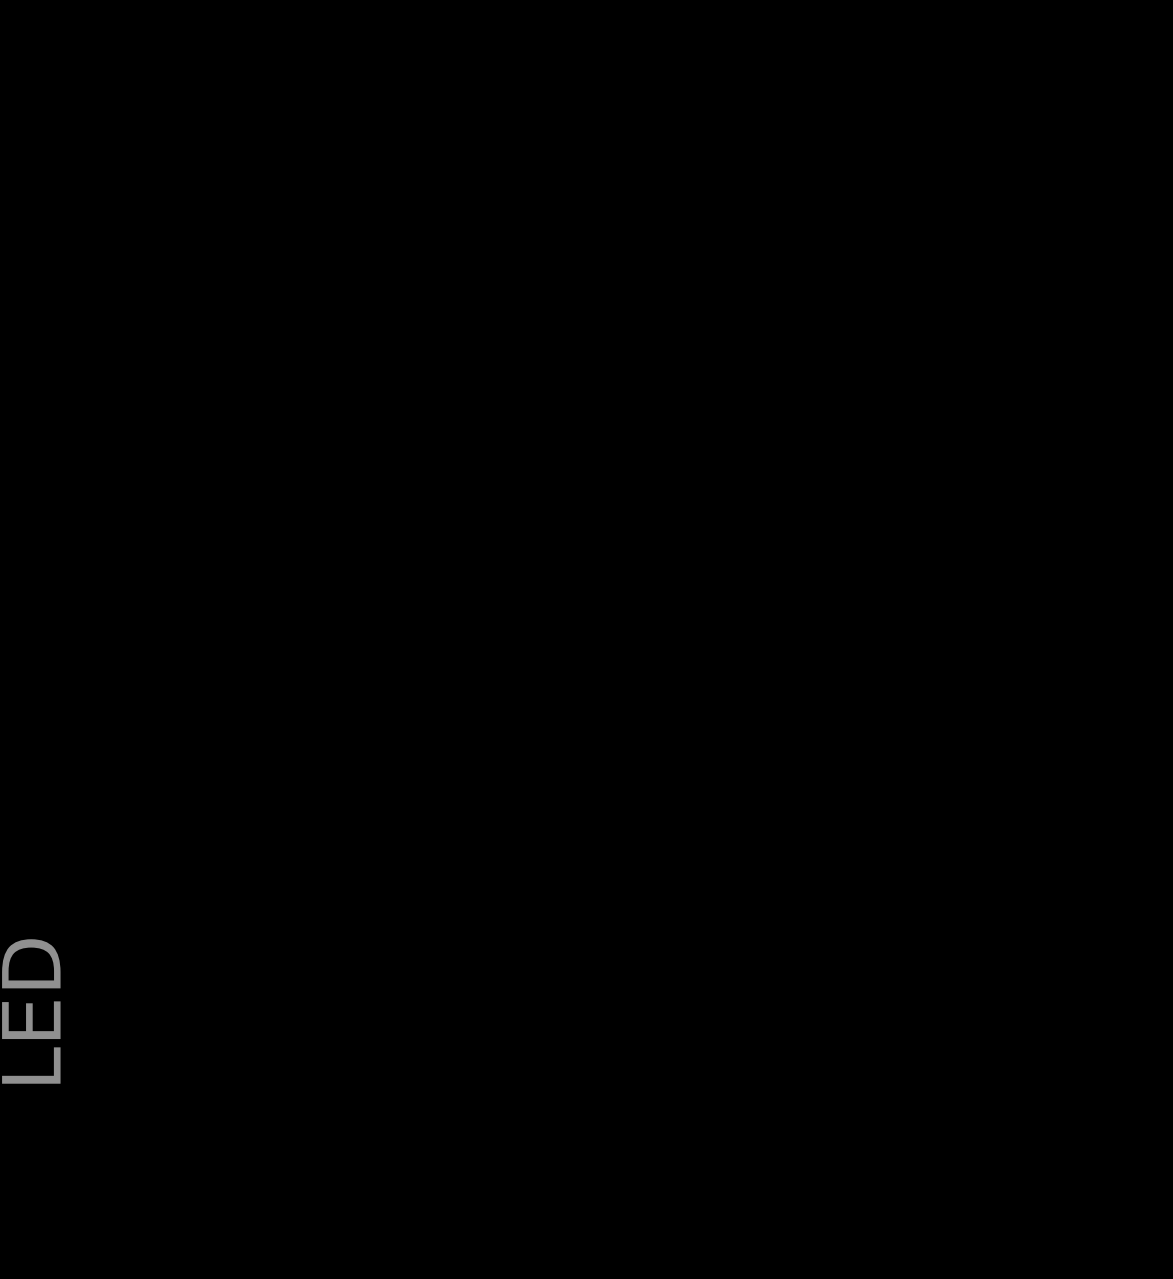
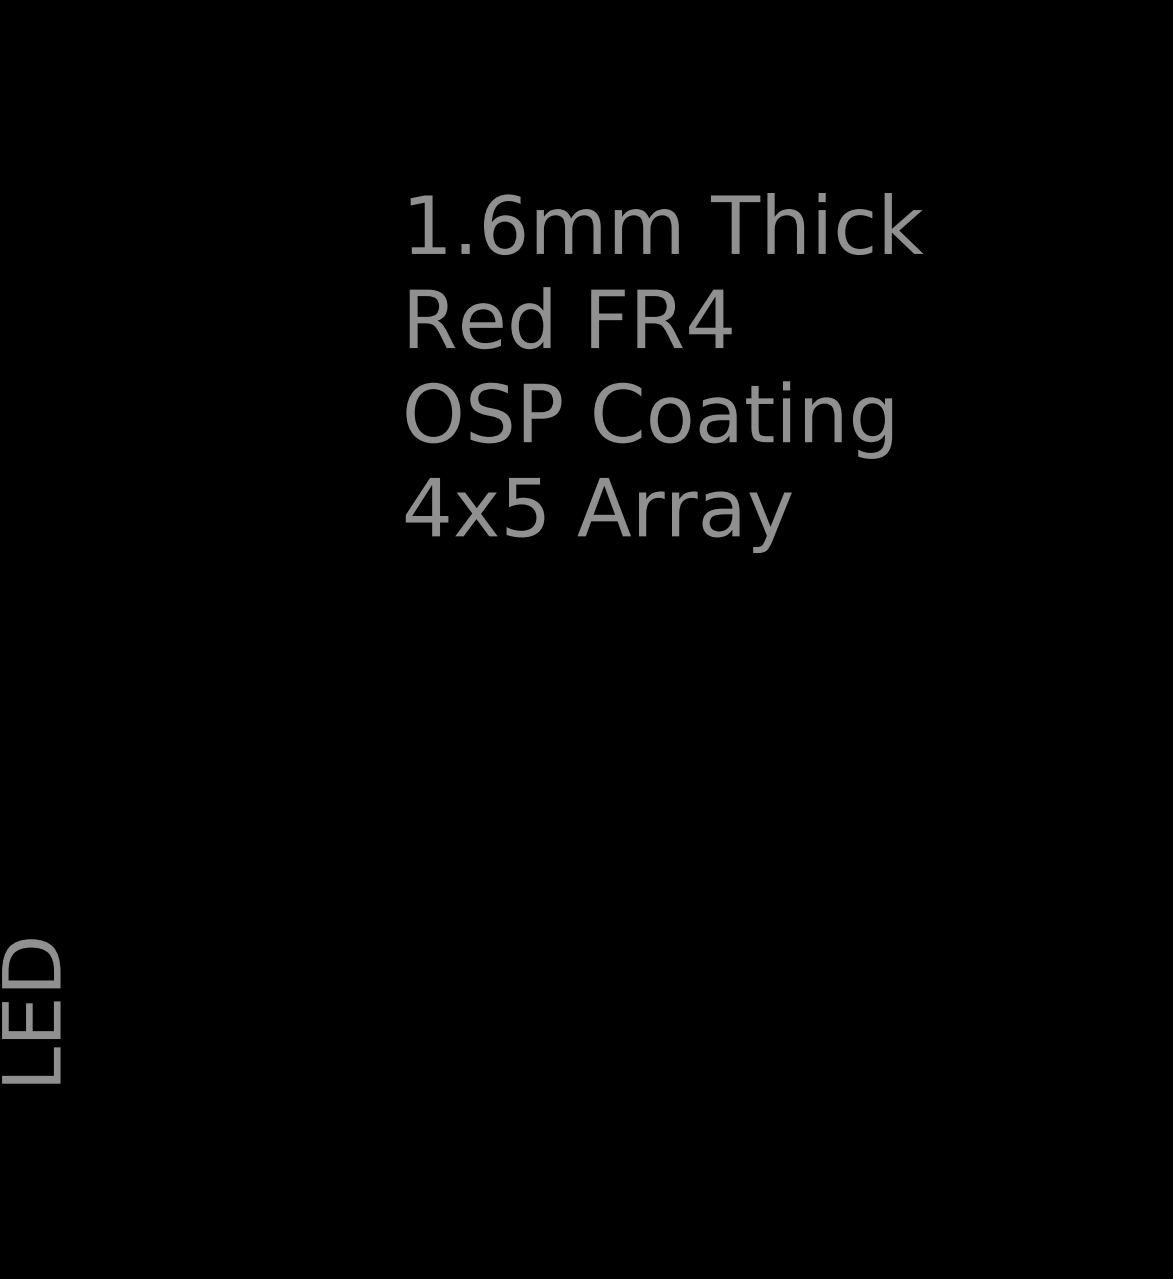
text: none -> 1.6mm Thick (667, 224)
text: none -> Red FR4 (570, 318)
text: none -> OSP Coating (649, 420)
text: none -> 4x5 Array (598, 515)

